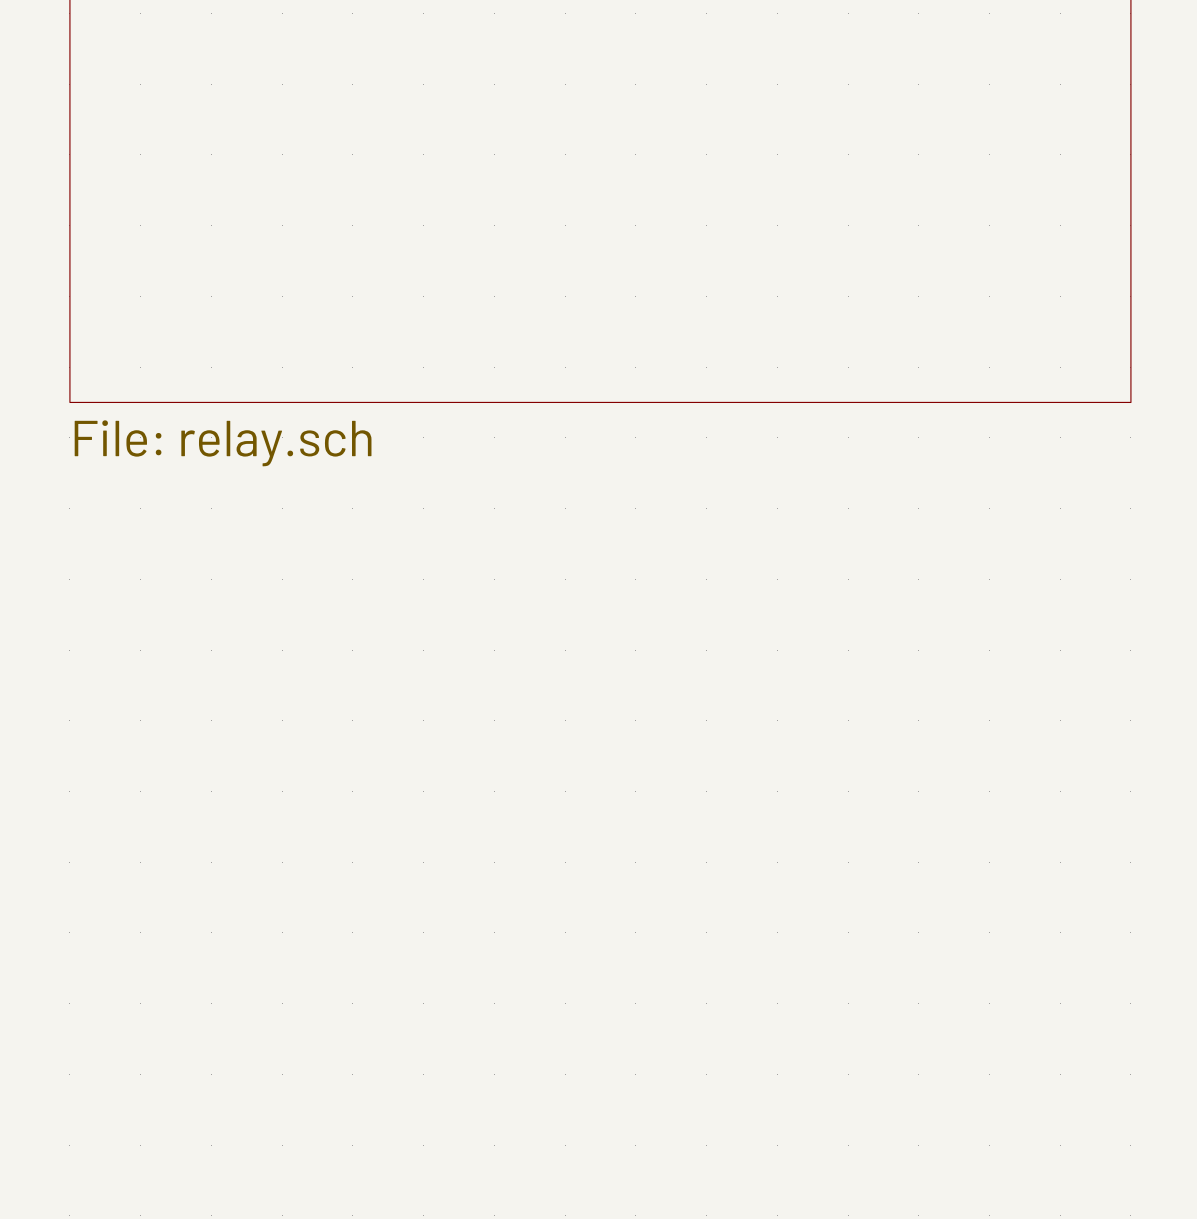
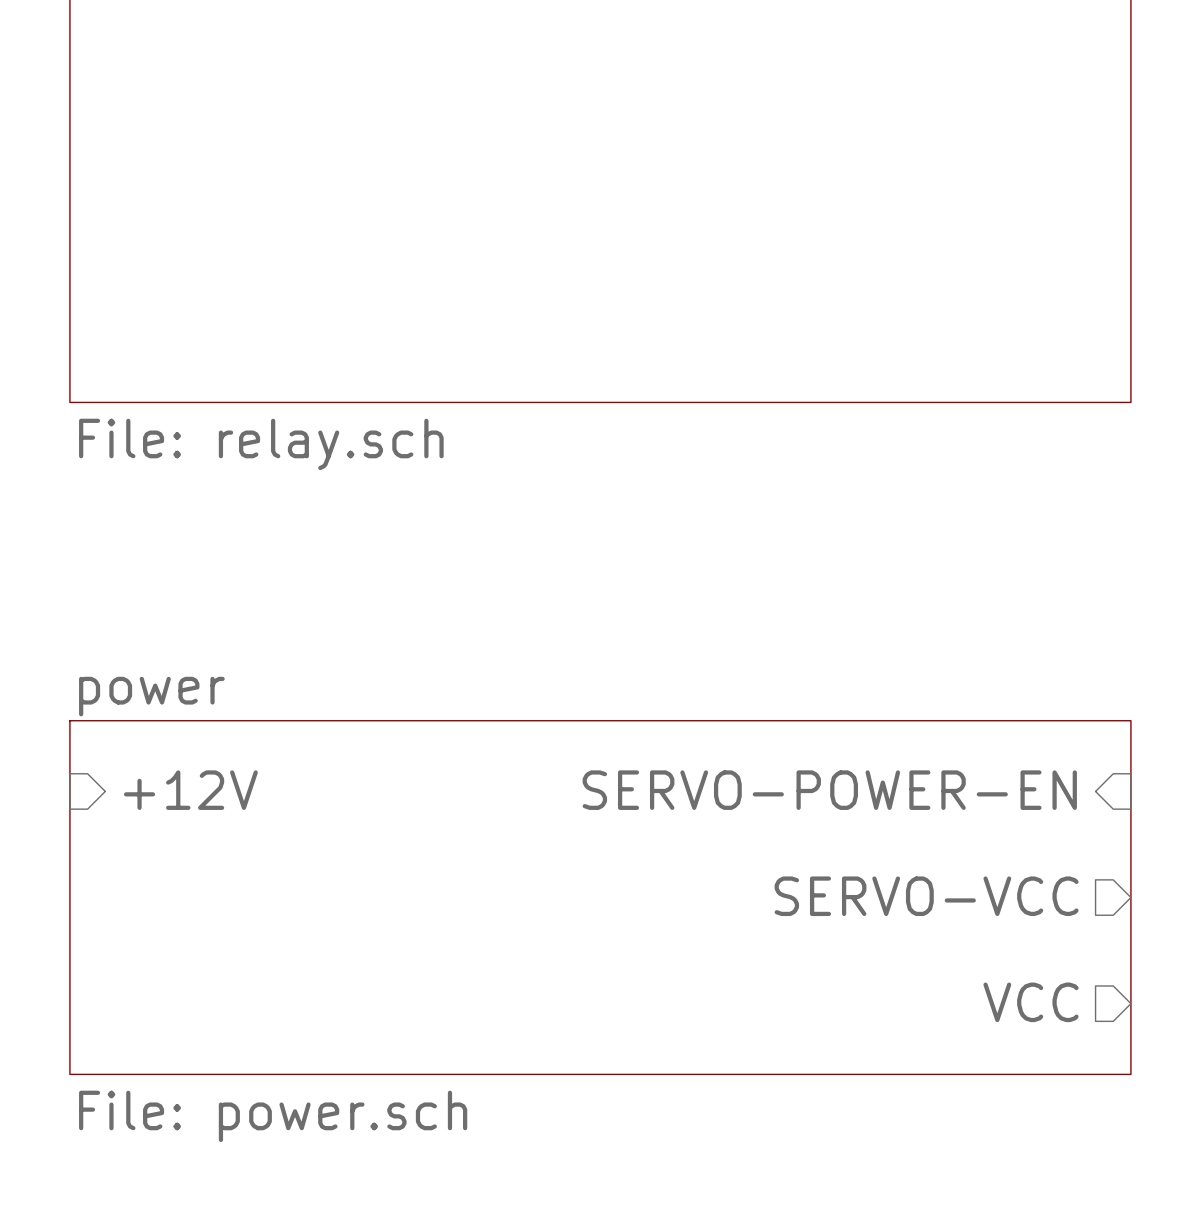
sheet pin: none -> +12V (190, 790)
sheet pin: none -> SERVO-POWER-EN (829, 790)
sheet pin: none -> SERVO-VCC (926, 896)
sheet power: none -> File: power.sch (600, 897)
sheet pin: none -> VCC (1031, 1002)

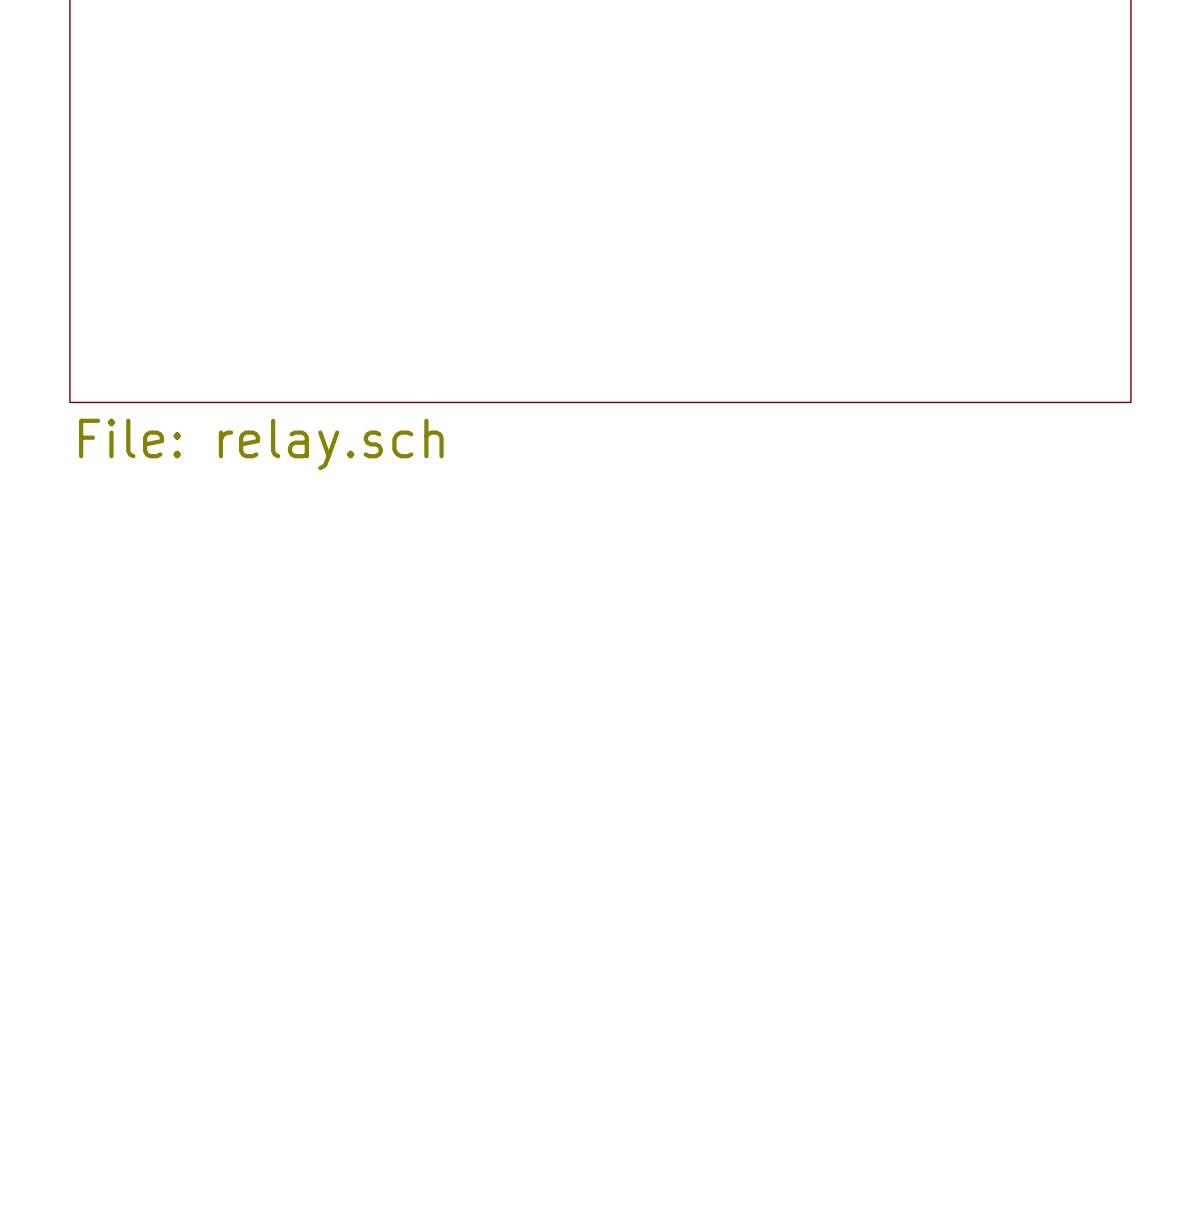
sheet pin: +12V (190, 790) -> none
sheet pin: SERVO-POWER-EN (829, 790) -> none
sheet pin: SERVO-VCC (926, 896) -> none
sheet power: File: power.sch (600, 897) -> none
sheet pin: VCC (1031, 1002) -> none

